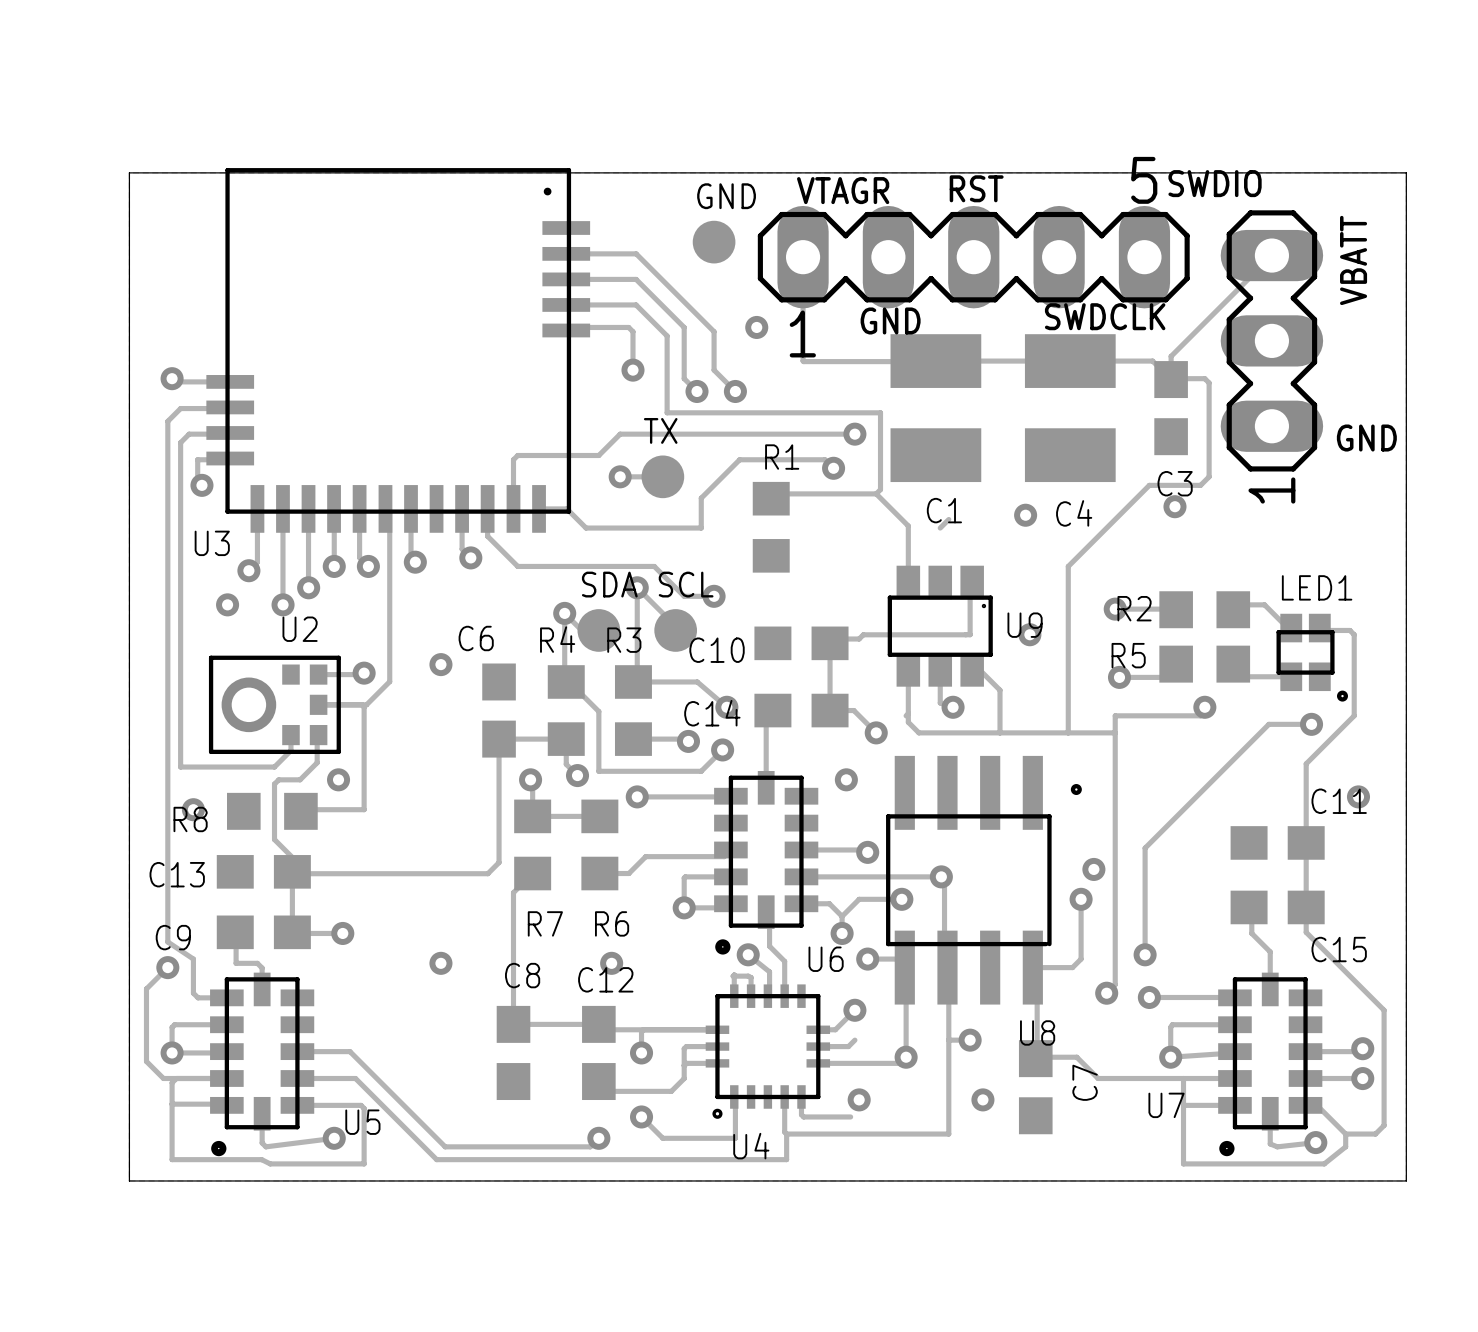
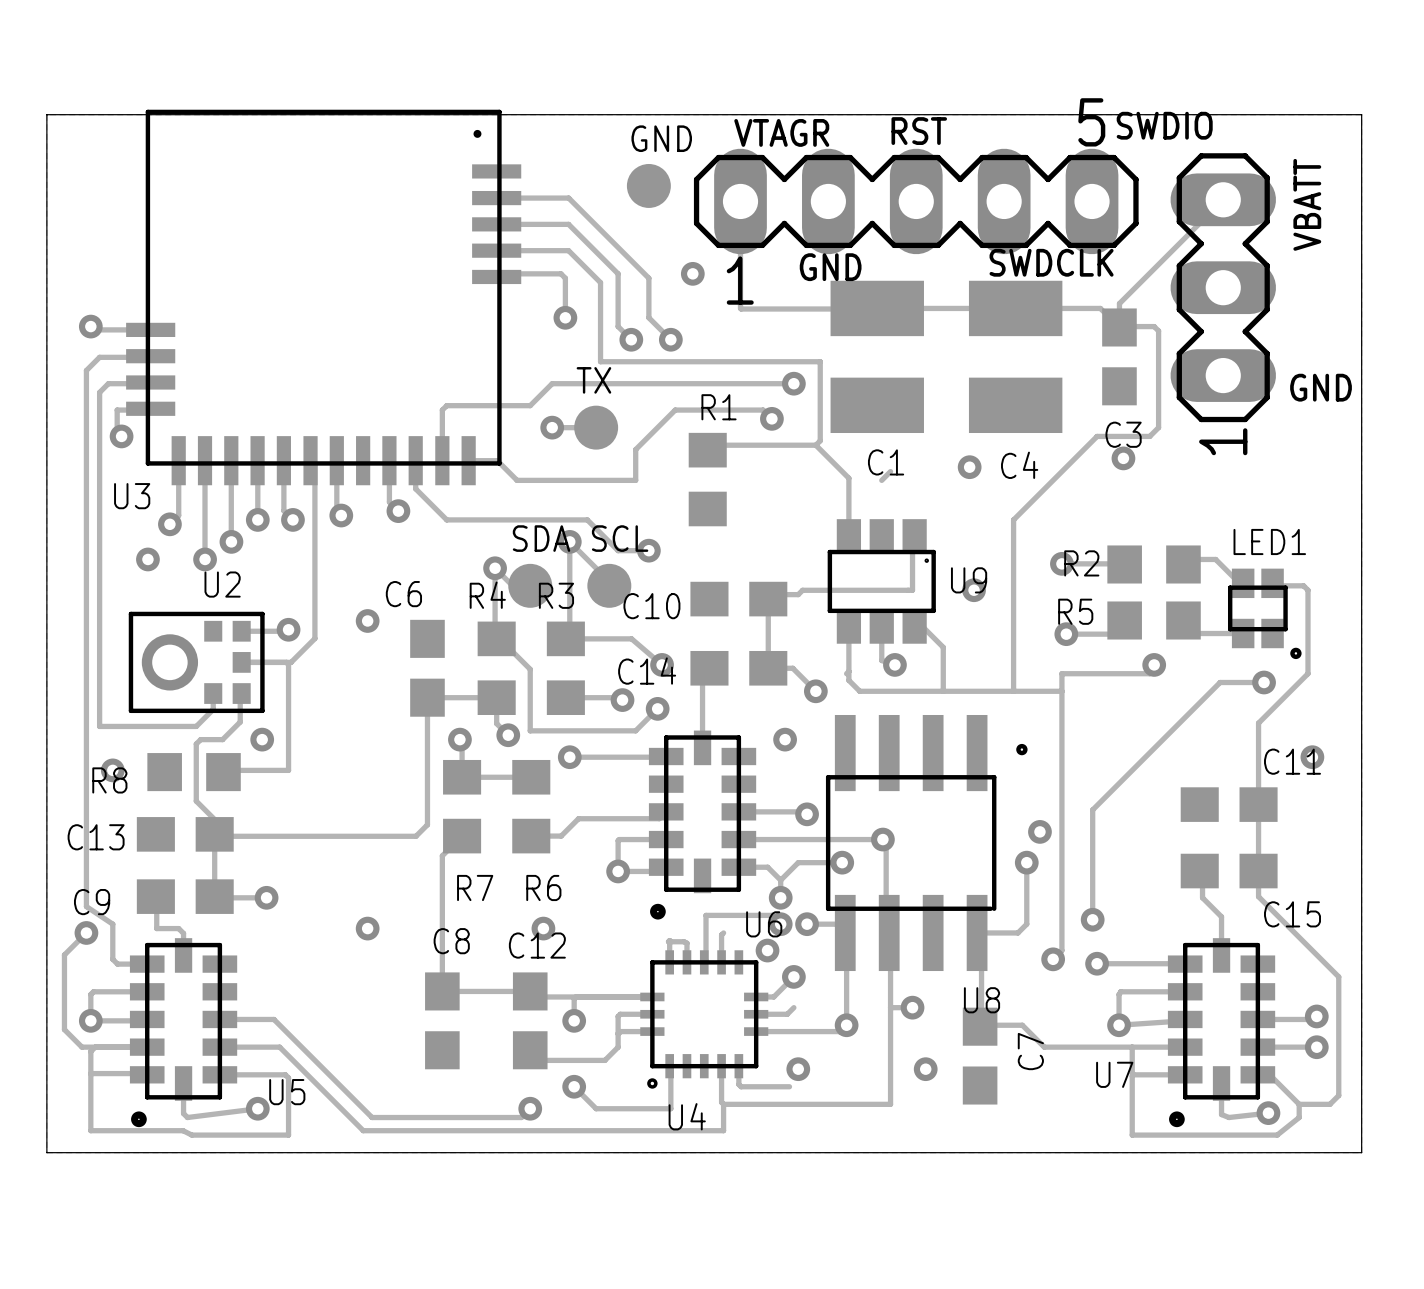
track: (766, 912) (769, 915) (769, 946) (784, 961) (784, 969) -> (723, 932) (721, 934)
track: (748, 954) (769, 971) -> (780, 924) (771, 915) (706, 915) (706, 937)
via: (748, 954) -> none
via: none -> (780, 924)
via: none -> (767, 950)

